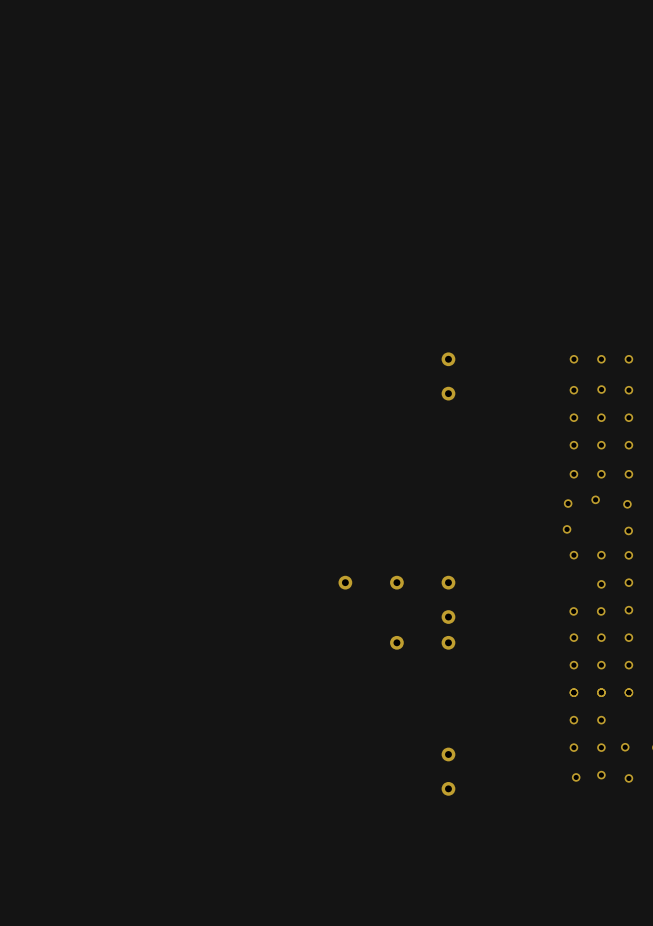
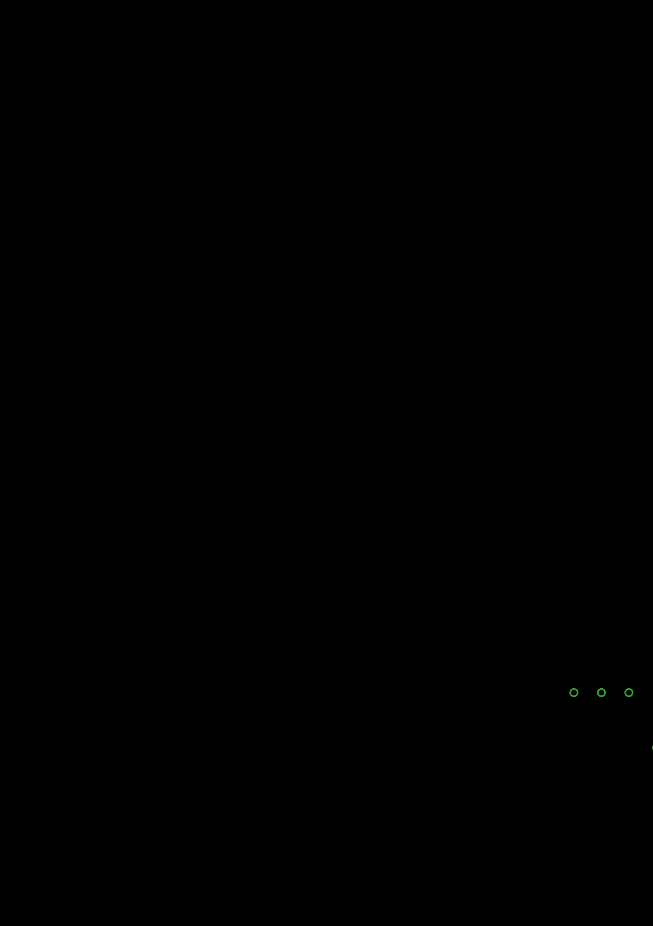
via: (448, 359) -> none
via: (573, 359) -> none
via: (601, 359) -> none
via: (628, 359) -> none
via: (601, 389) -> none
via: (573, 390) -> none
via: (628, 390) -> none
via: (448, 393) -> none
via: (573, 417) -> none
via: (601, 417) -> none
via: (628, 417) -> none
via: (573, 445) -> none
via: (601, 445) -> none
via: (628, 445) -> none
via: (573, 474) -> none
via: (601, 474) -> none
via: (628, 474) -> none
via: (595, 499) -> none
via: (568, 503) -> none
via: (627, 504) -> none
via: (567, 529) -> none
via: (628, 530) -> none
via: (573, 555) -> none
via: (601, 555) -> none
via: (628, 555) -> none
via: (345, 582) -> none
via: (396, 582) -> none
via: (448, 582) -> none
via: (628, 582) -> none
via: (601, 584) -> none
via: (628, 610) -> none
via: (573, 611) -> none
via: (601, 611) -> none
via: (448, 617) -> none
via: (573, 637) -> none
via: (601, 637) -> none
via: (628, 637) -> none
via: (396, 642) -> none
via: (448, 642) -> none
via: (573, 665) -> none
via: (601, 665) -> none
via: (628, 665) -> none
via: (573, 720) -> none
via: (601, 720) -> none
via: (573, 747) -> none
via: (601, 747) -> none
via: (625, 747) -> none
via: (448, 754) -> none
via: (601, 775) -> none
via: (576, 777) -> none
via: (628, 778) -> none
via: (448, 788) -> none

